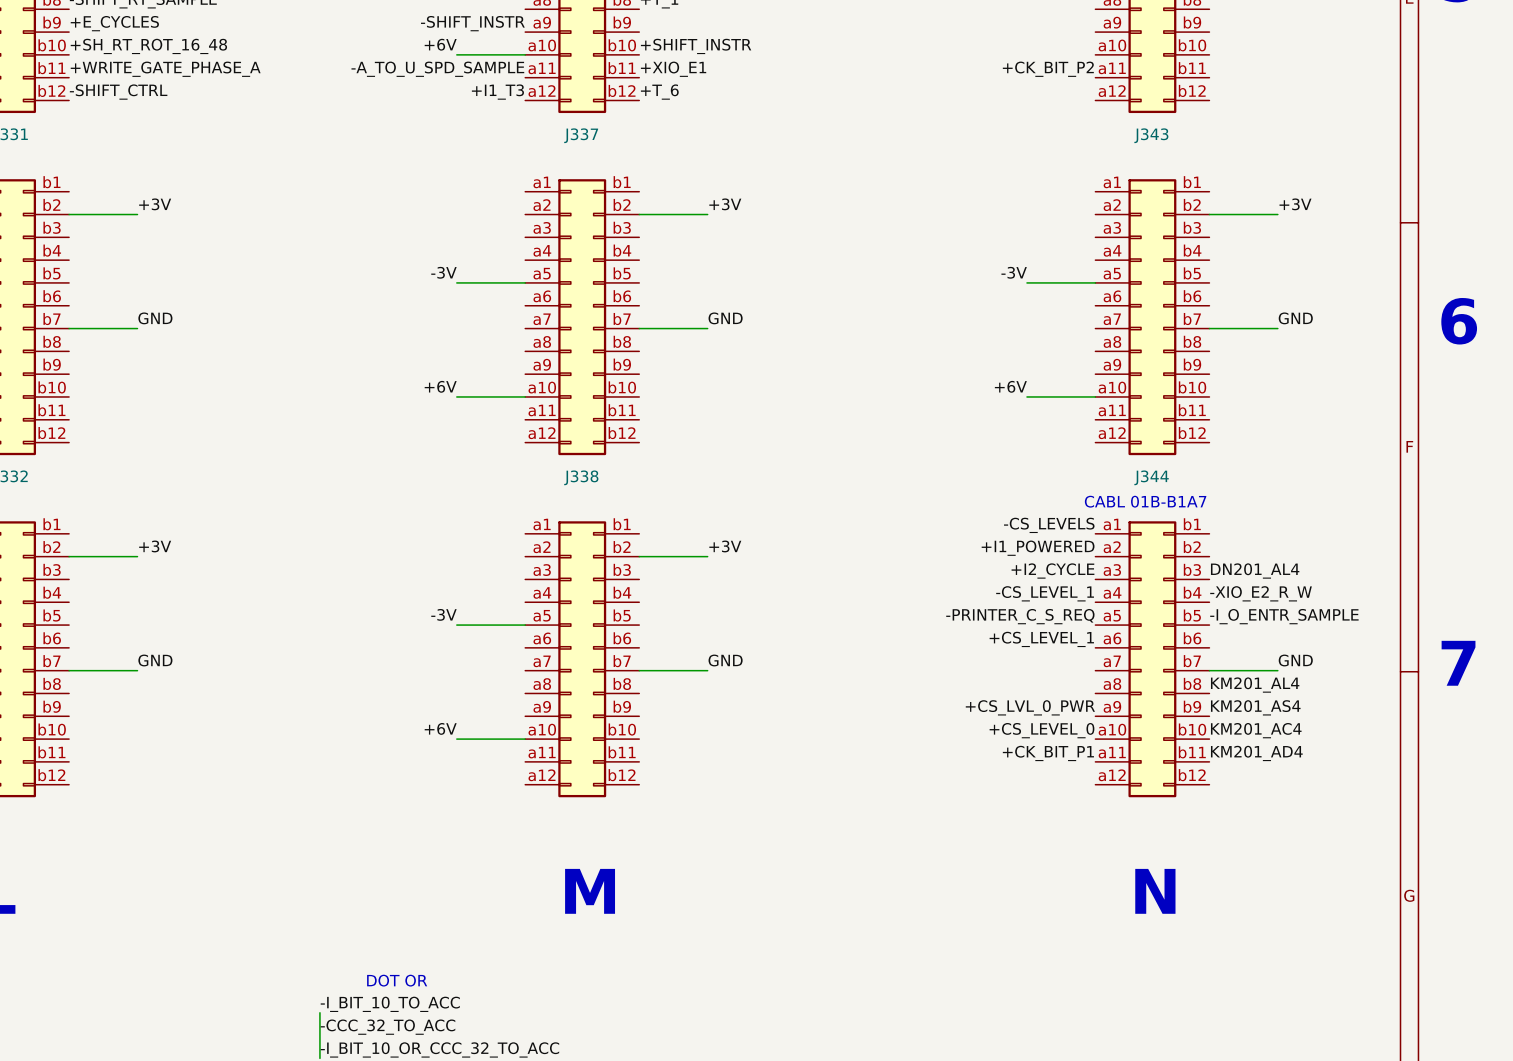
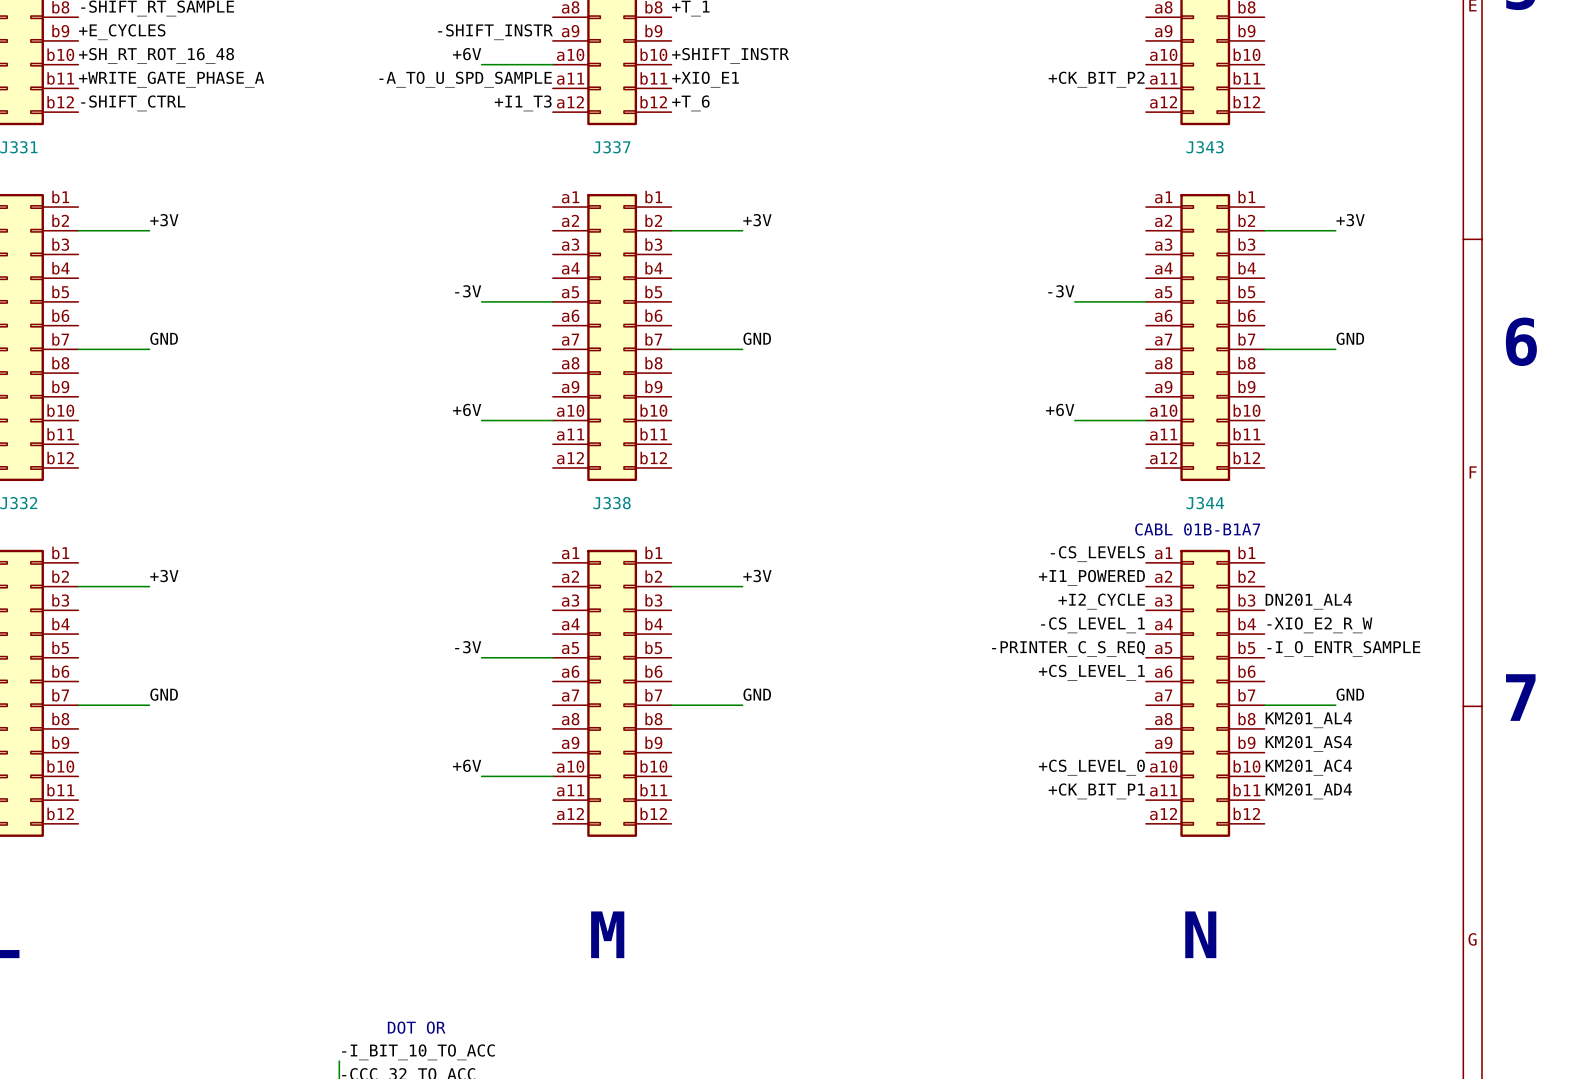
label: +CS_LVL_0_PWR (1030, 707) -> none

